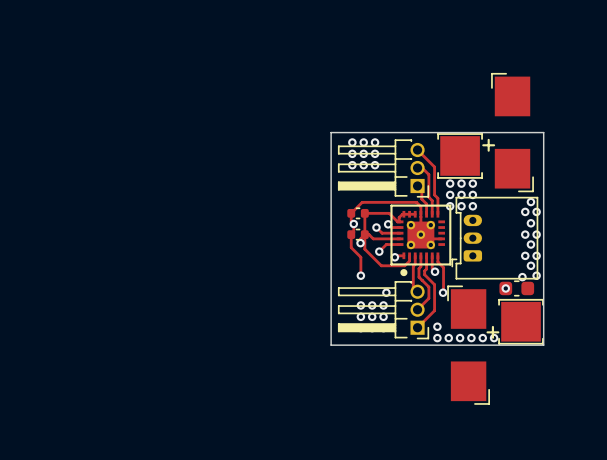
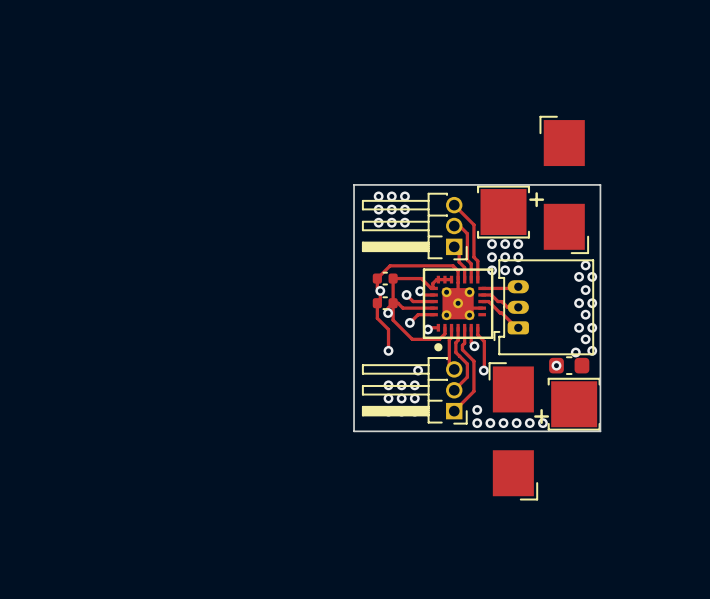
track: none -> (482, 288) (516, 288)
track: none -> (482, 294) (491, 294) (507, 307) (518, 307)
track: none -> (482, 301) (488, 301) (516, 327)

